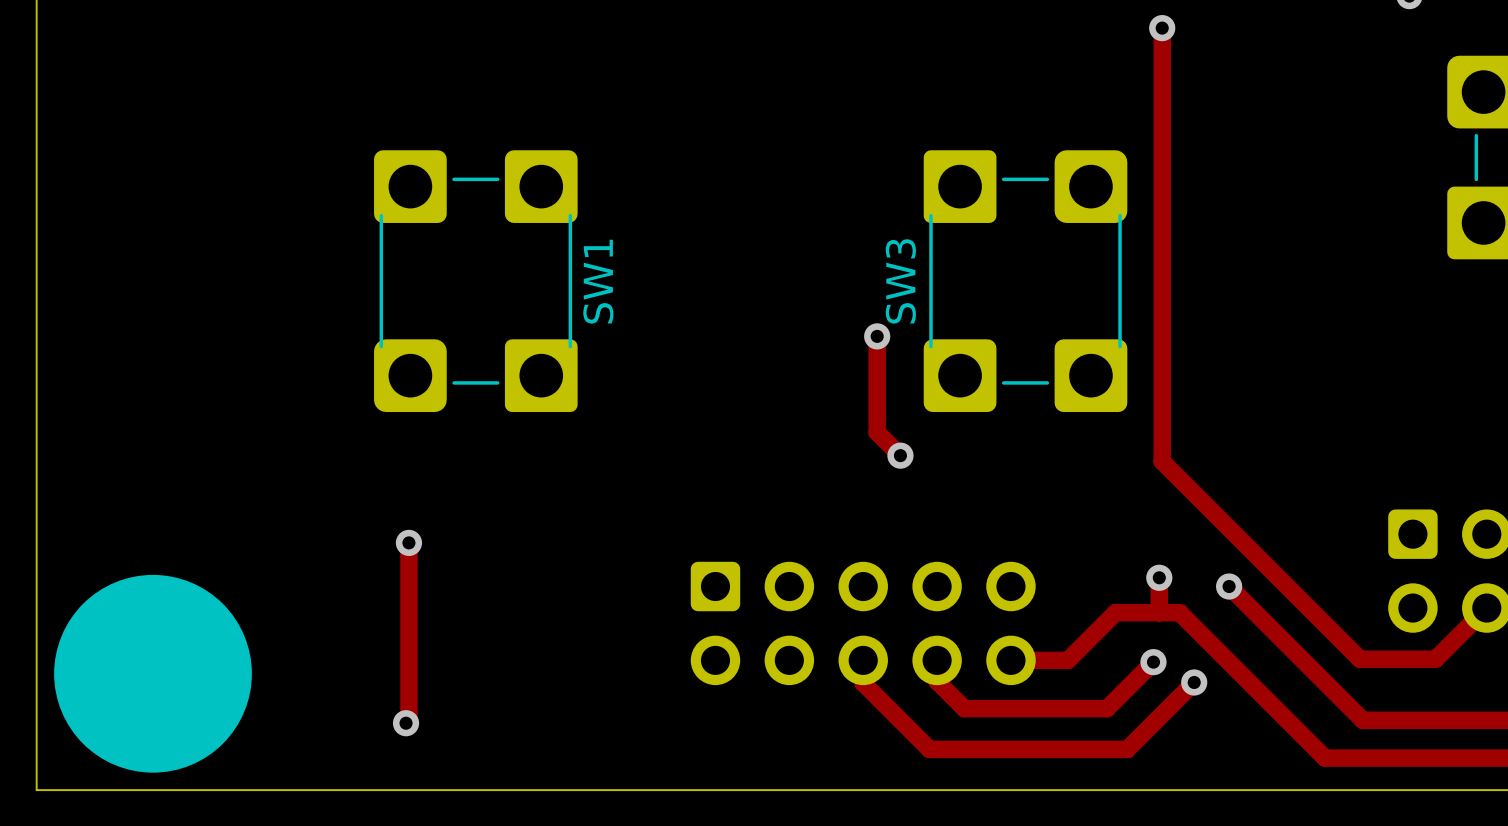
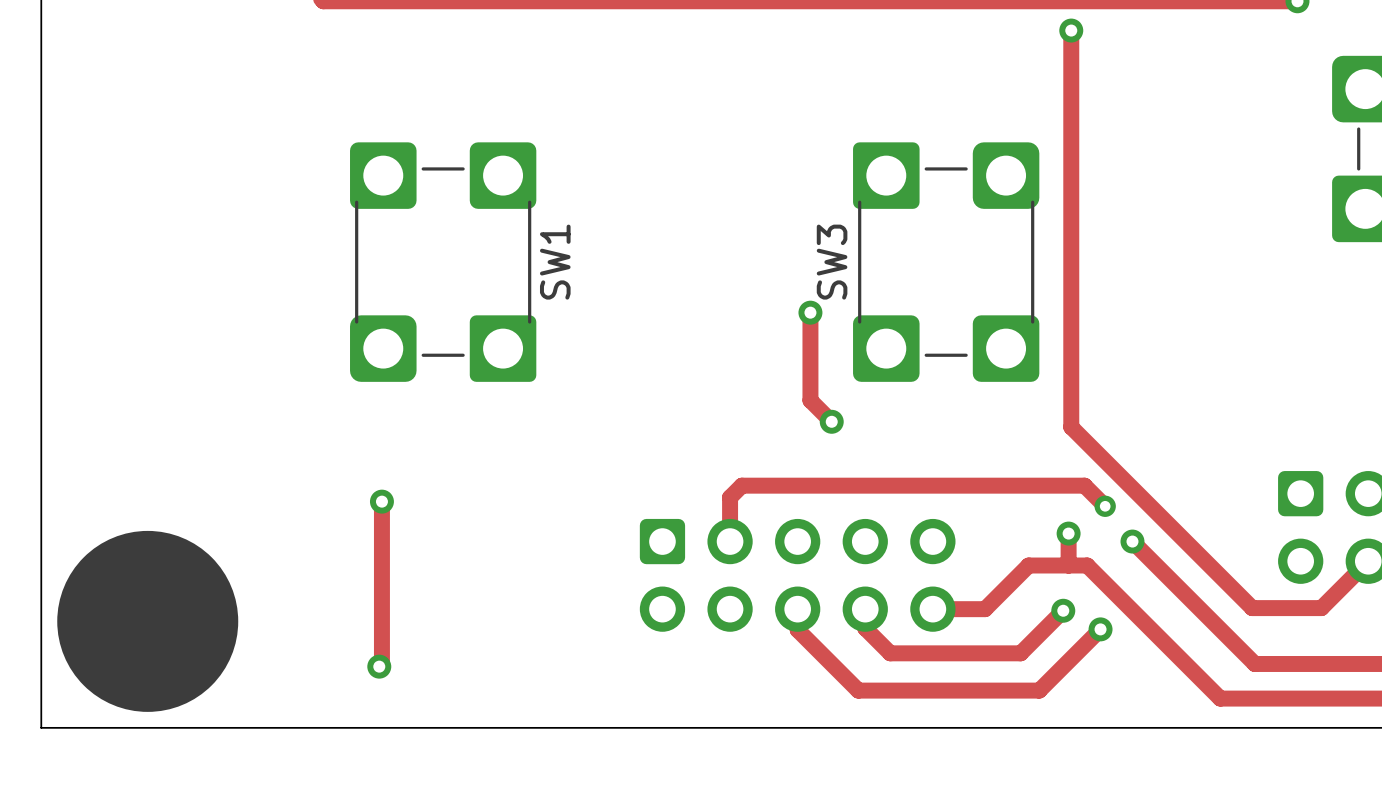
track: none -> (1105, 506) (1084, 485) (741, 485) (730, 497) (730, 541)
via: none -> (1105, 506)

